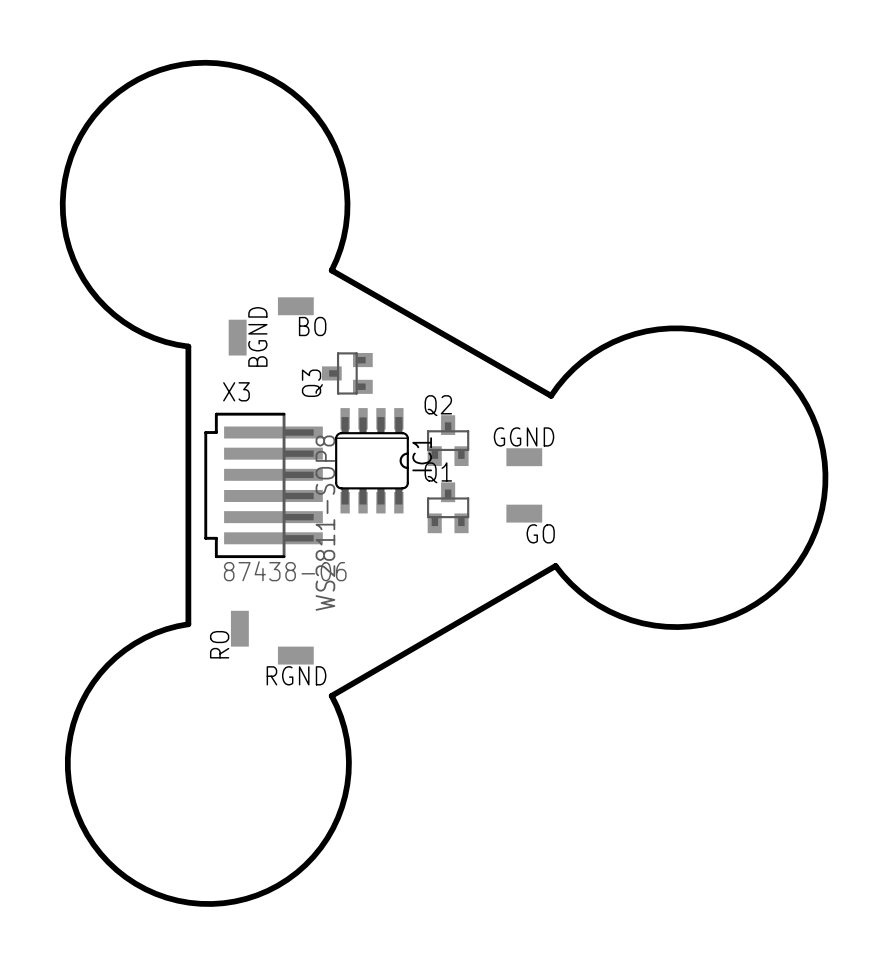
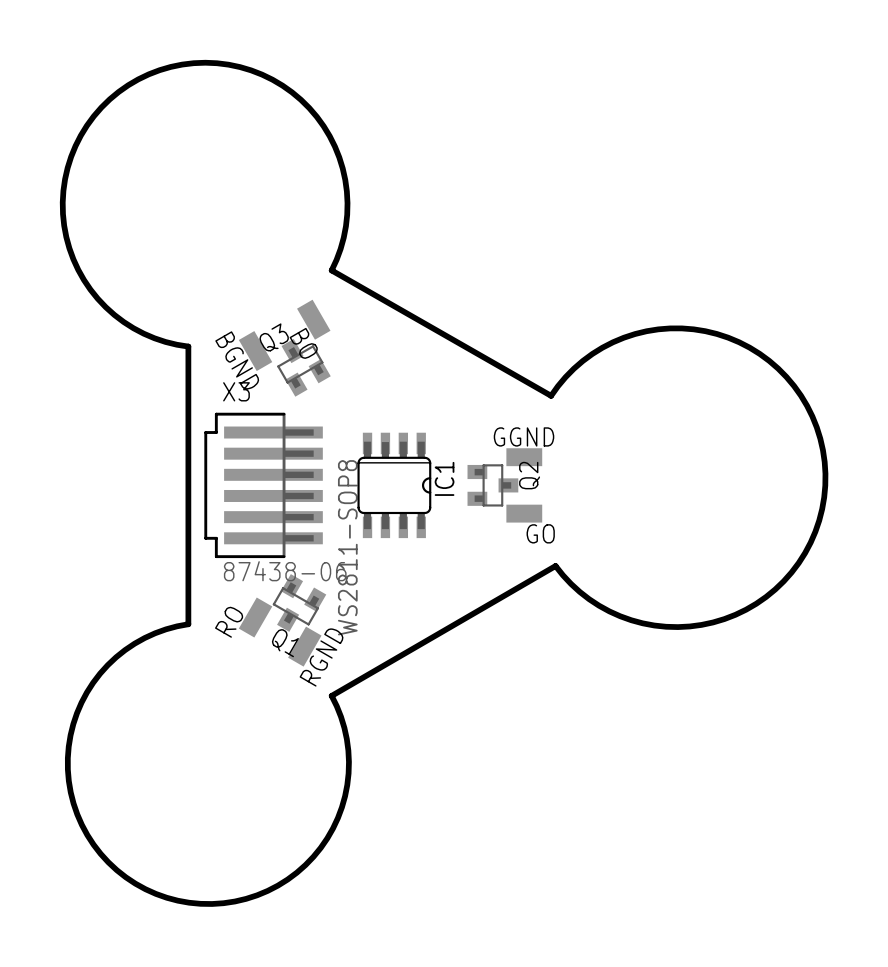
BO: (295, 306) -> none
BO: none -> (313, 319)
BGND: (237, 337) -> none
BGND: none -> (255, 351)
Q3 rotation: 0° (347, 373) -> 60° clockwise (303, 367)
Q3 position: (347, 373) -> (303, 367)
Q2 rotation: 0° (448, 440) -> 90° clockwise (492, 485)
Q2 position: (448, 440) -> (492, 485)
IC1 position: (371, 460) -> (394, 485)
Q1 rotation: 0° (448, 507) -> 150° counterclockwise (299, 602)
Q1 position: (448, 507) -> (299, 602)
RO: none -> (255, 617)
RO: (239, 628) -> none
RGND rotation: 0° (295, 655) -> 60° counterclockwise (304, 646)

